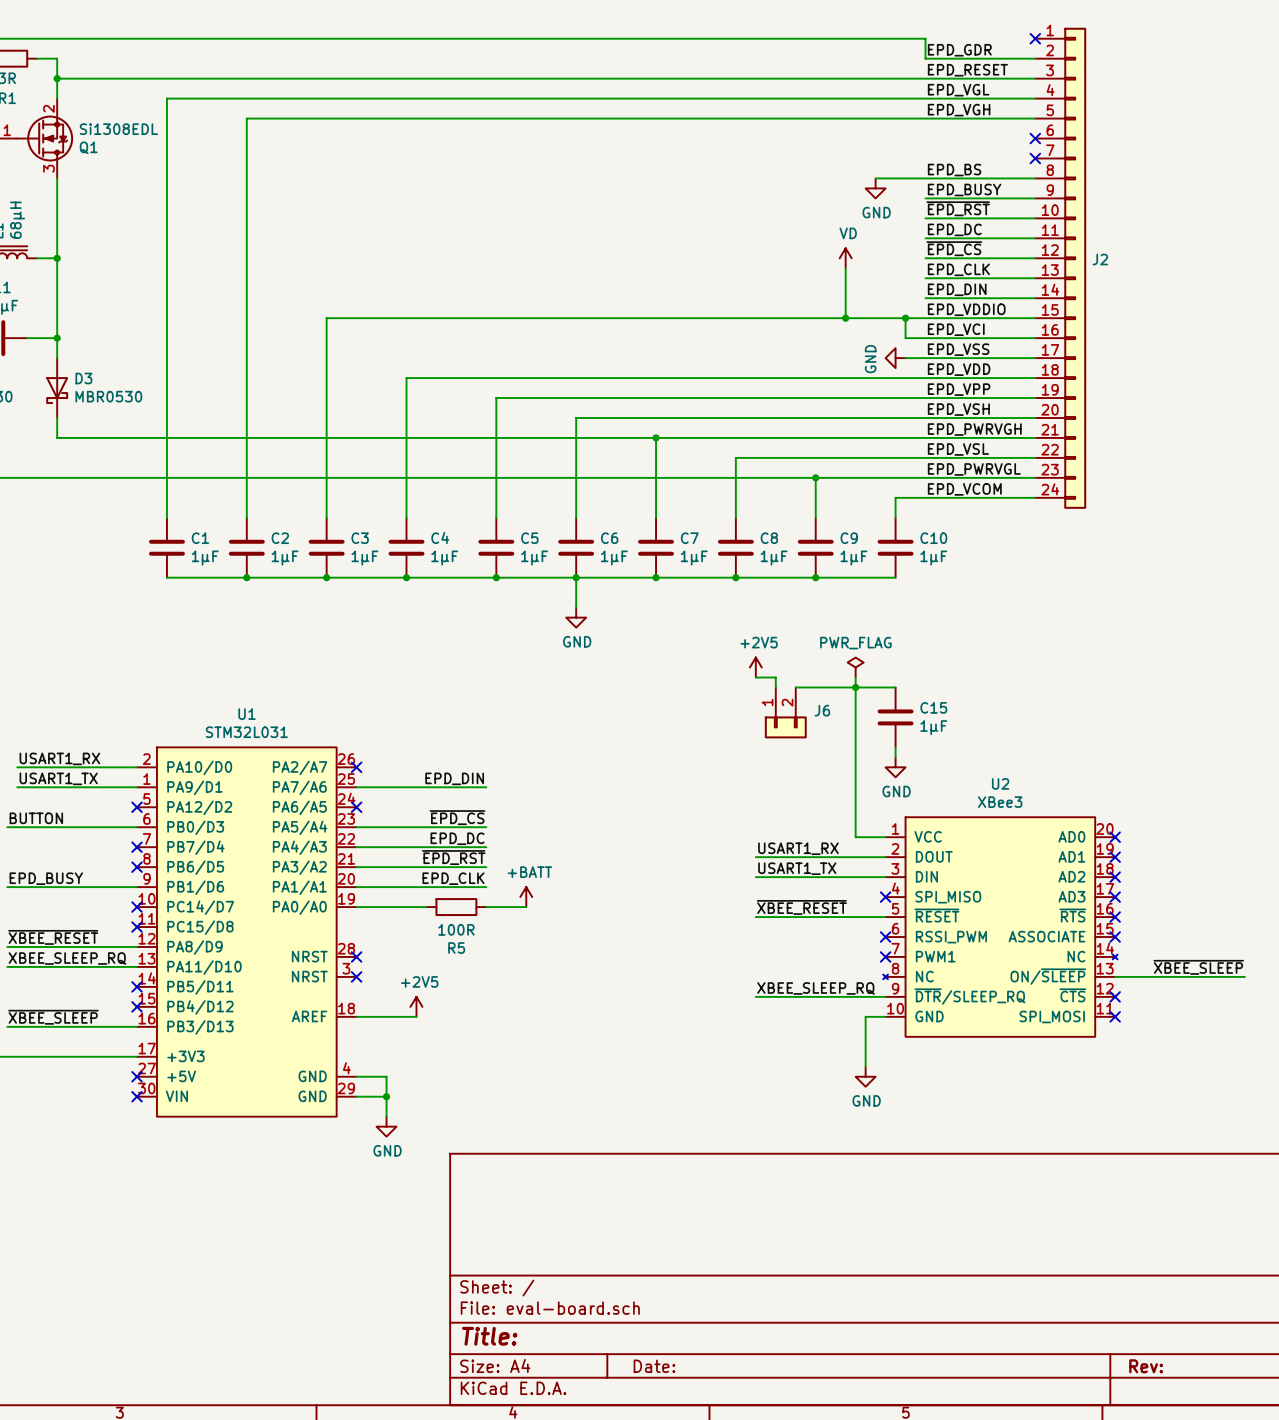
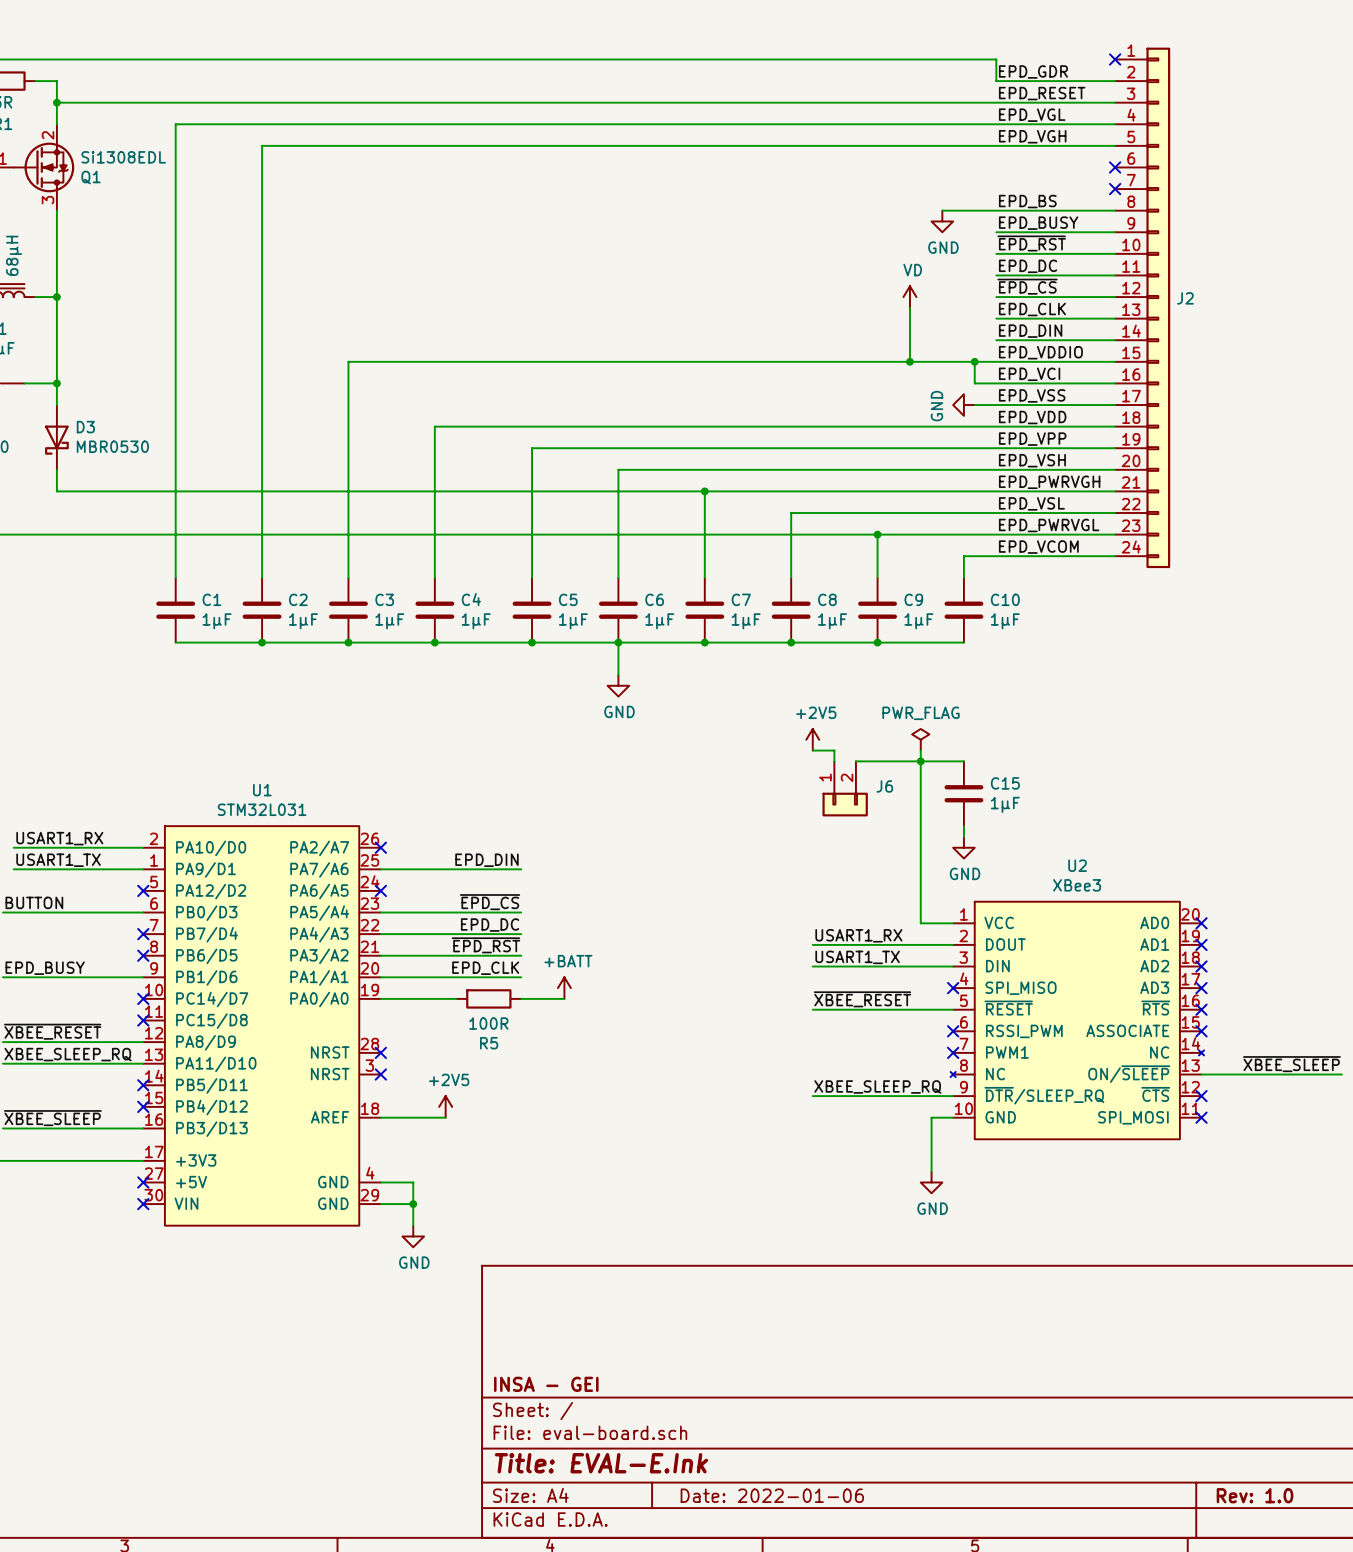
title block: none -> INSA - GEI (546, 1384)
title block: Title: (489, 1336) -> Title: EVAL-E.Ink (601, 1463)
title block: Date: (654, 1366) -> Date: 2022-01-06 (772, 1495)
title block: Rev: (1146, 1366) -> Rev: 1.0 (1255, 1495)

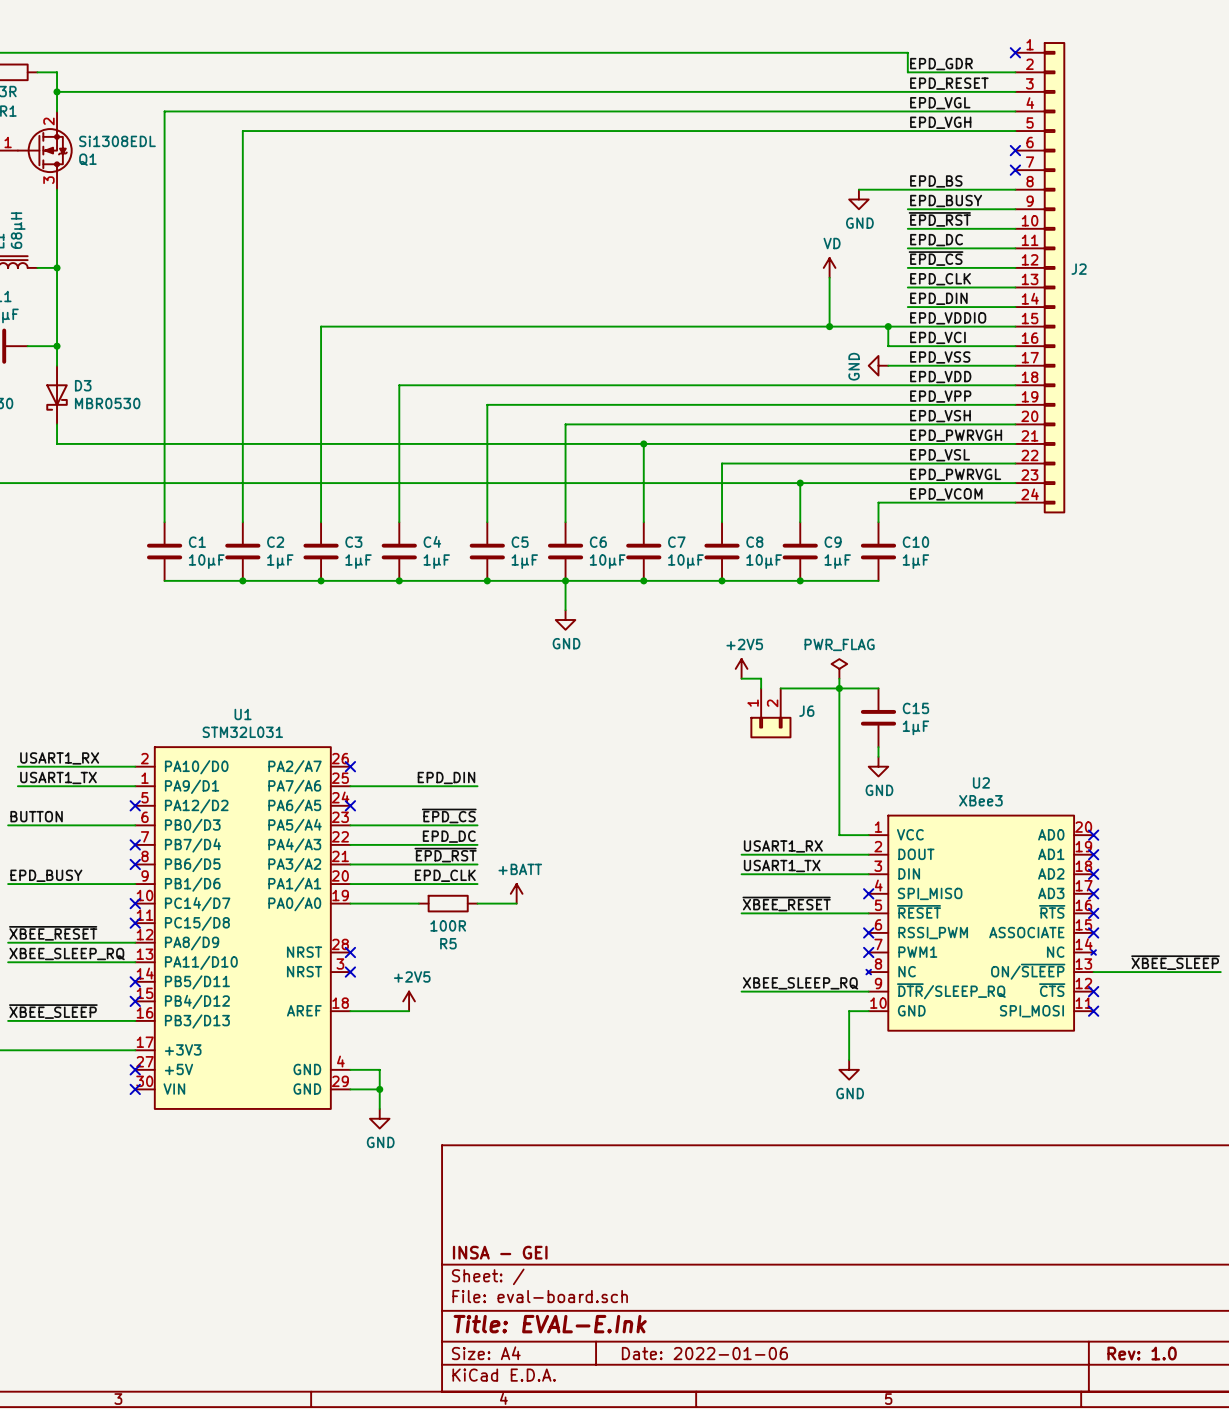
C1 value: 1µF (217, 621) -> 10µF (206, 561)
C6 value: 1µF (659, 621) -> 10µF (607, 561)
C7 value: 1µF (746, 621) -> 10µF (685, 561)
C8 value: 1µF (832, 621) -> 10µF (764, 561)

